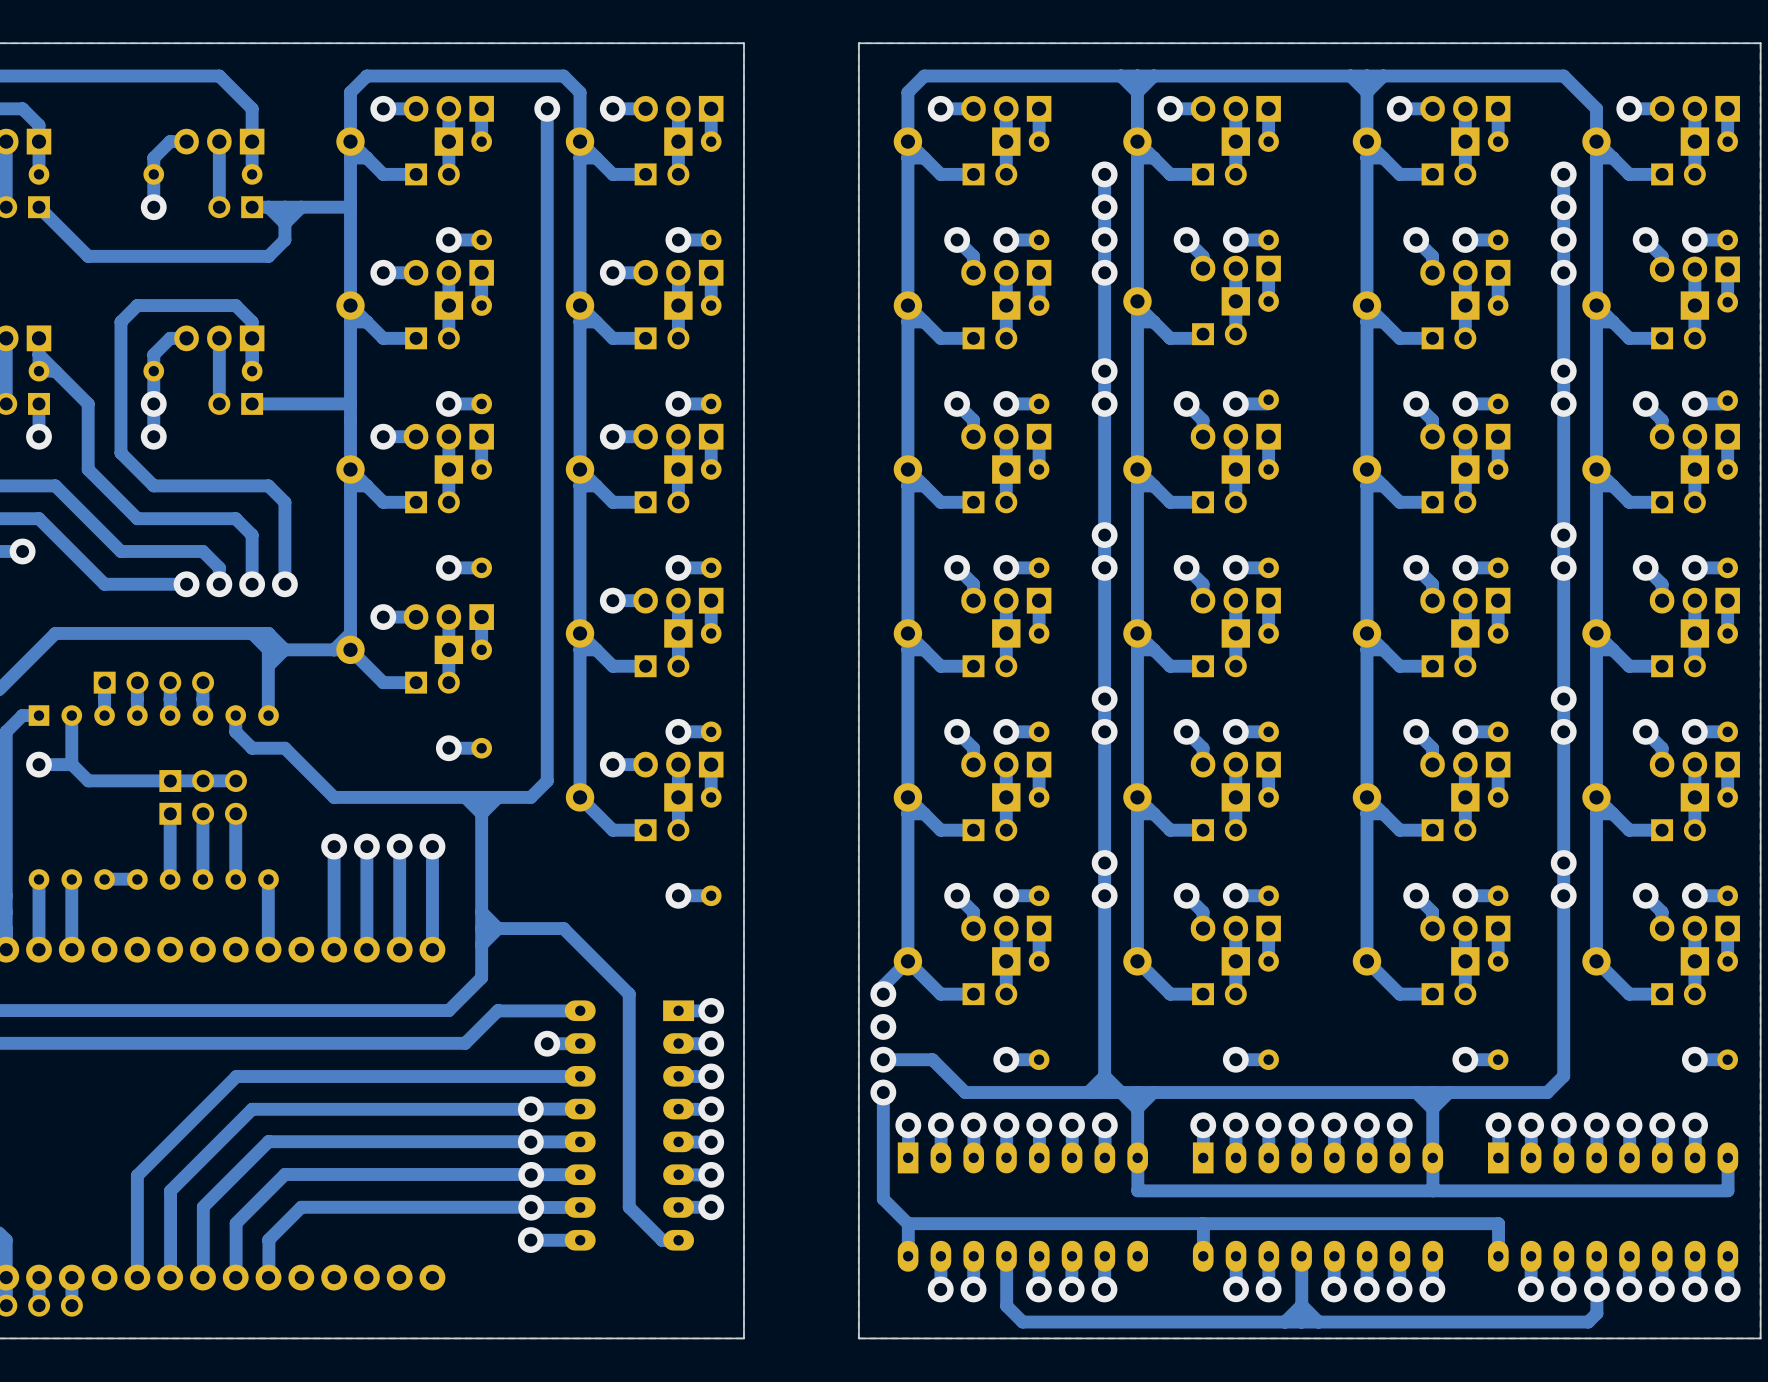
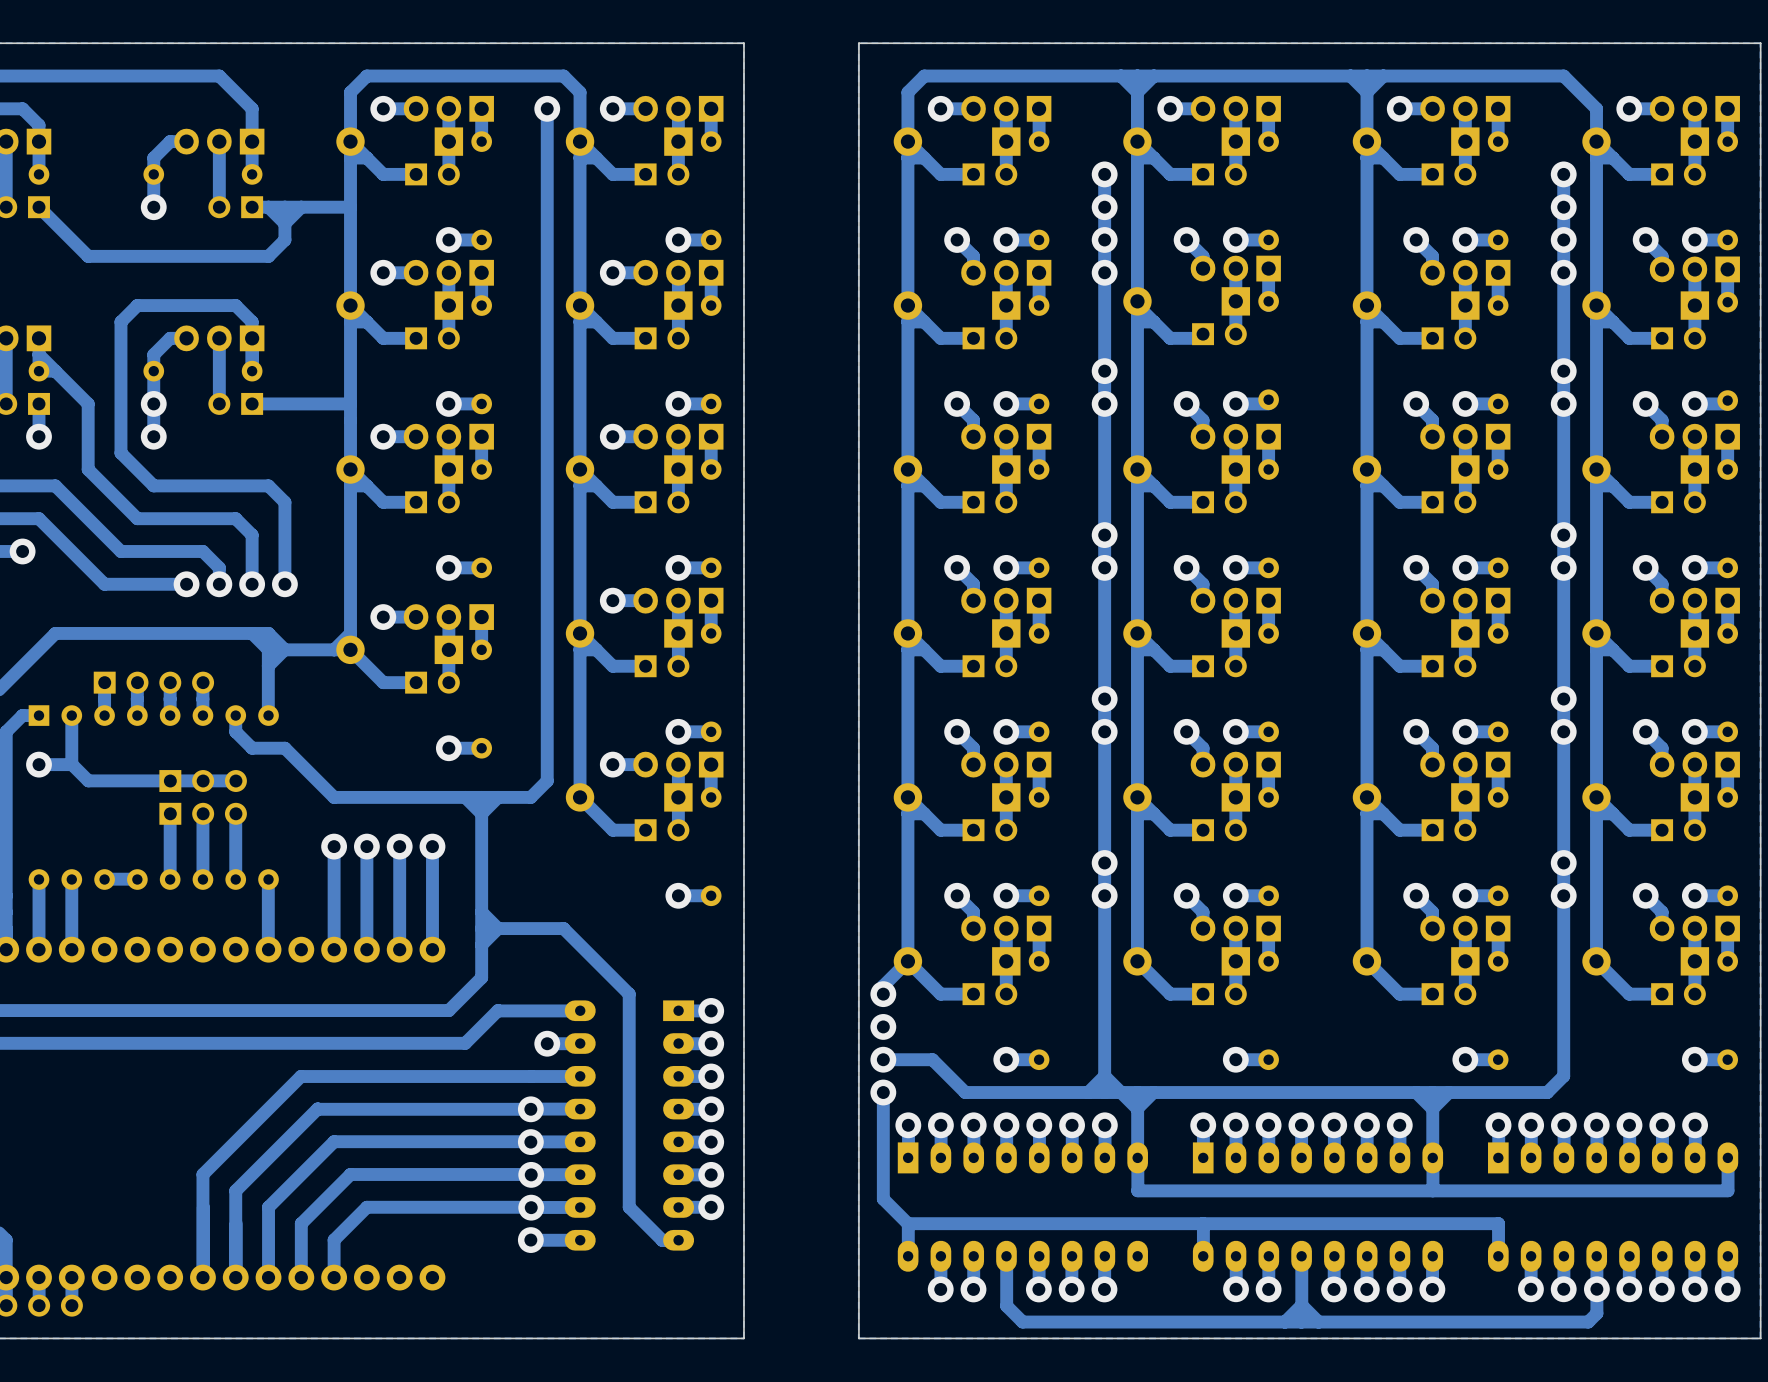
bottom track: (300, 1076) (236, 1076) (137, 1175) (137, 1277) -> (300, 1076) (202, 1174) (202, 1272)
bottom track: (318, 1109) (252, 1109) (170, 1190) (170, 1272) -> (318, 1109) (235, 1190) (235, 1272)
bottom track: (268, 1141) (203, 1206) -> none
bottom track: (334, 1141) (268, 1141) -> none
bottom track: (350, 1174) (284, 1174) (236, 1223) -> (350, 1174) (301, 1223) (301, 1272)
bottom track: (366, 1207) (301, 1207) (268, 1240) -> (366, 1207) (334, 1240) (334, 1272)
bottom track: (268, 1240) (268, 1272) -> (334, 1141) (268, 1207) (268, 1272)

